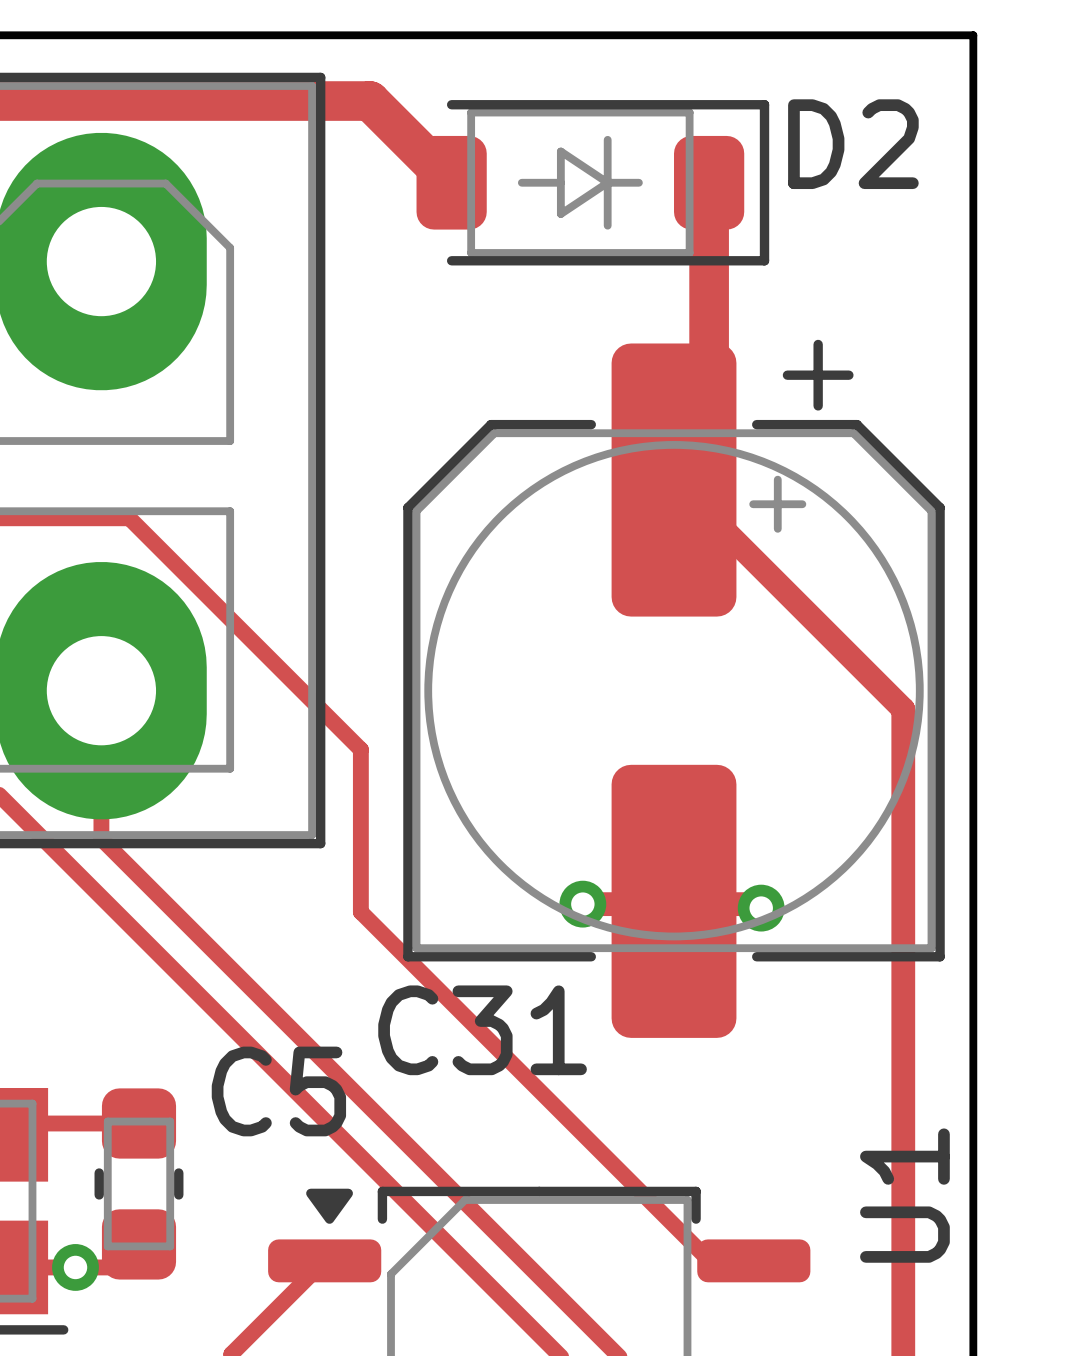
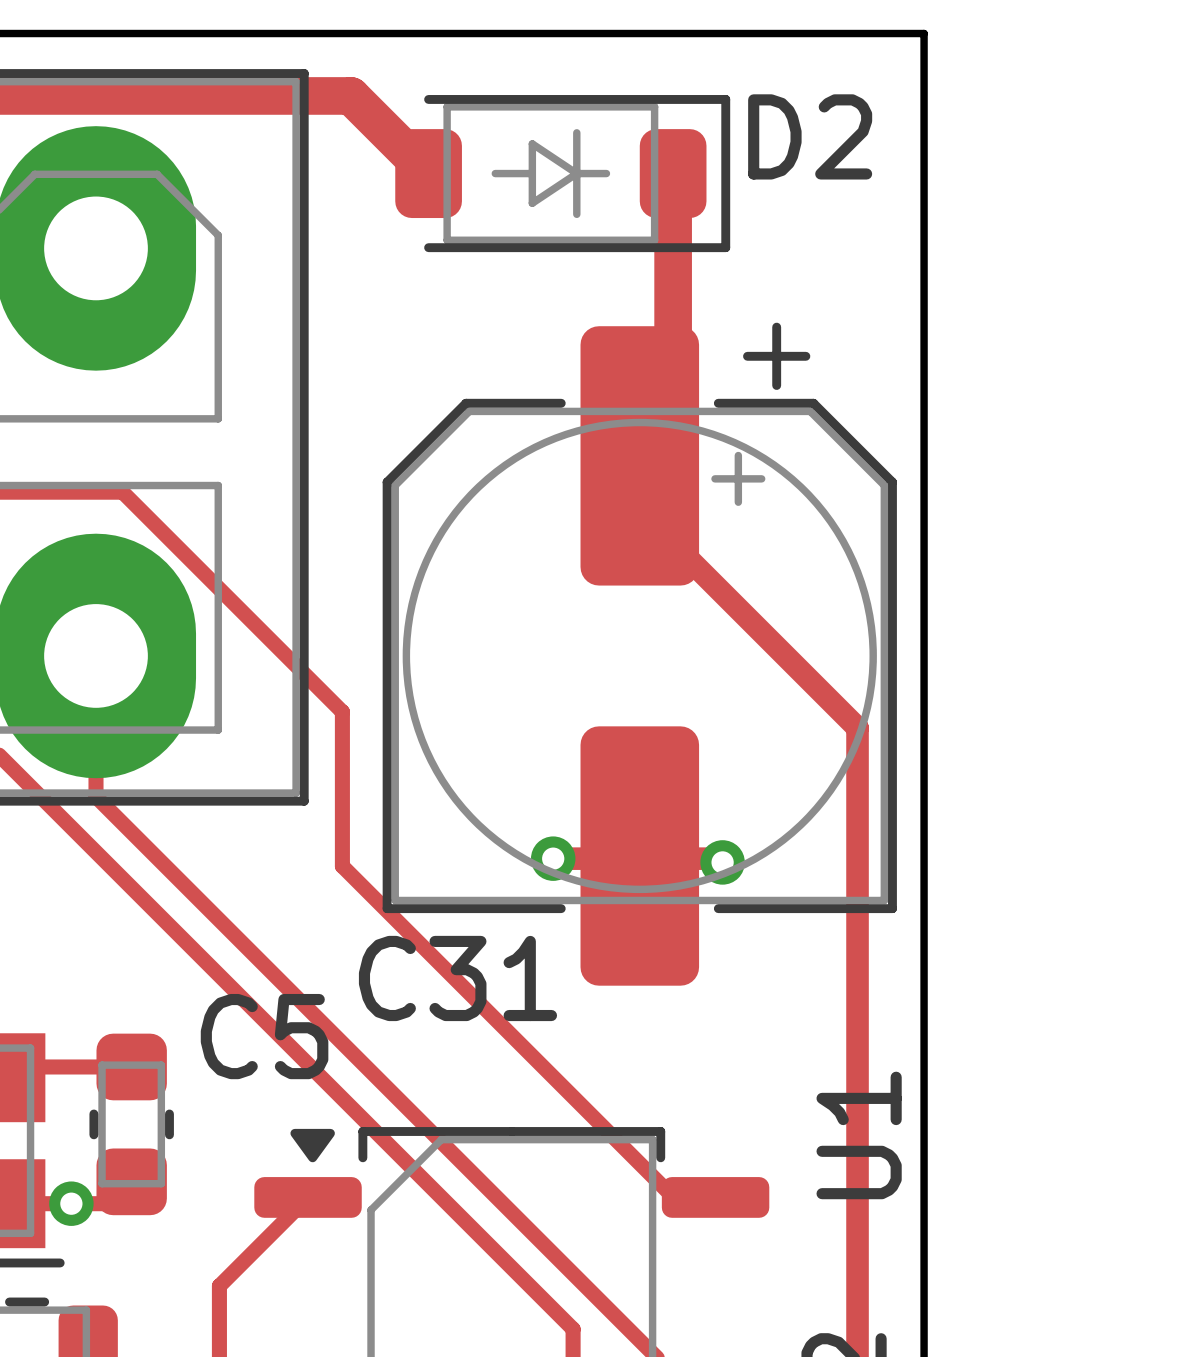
top track: (674, 480) (903, 709) (903, 766) -> (639, 455) (639, 510) (857, 727)

